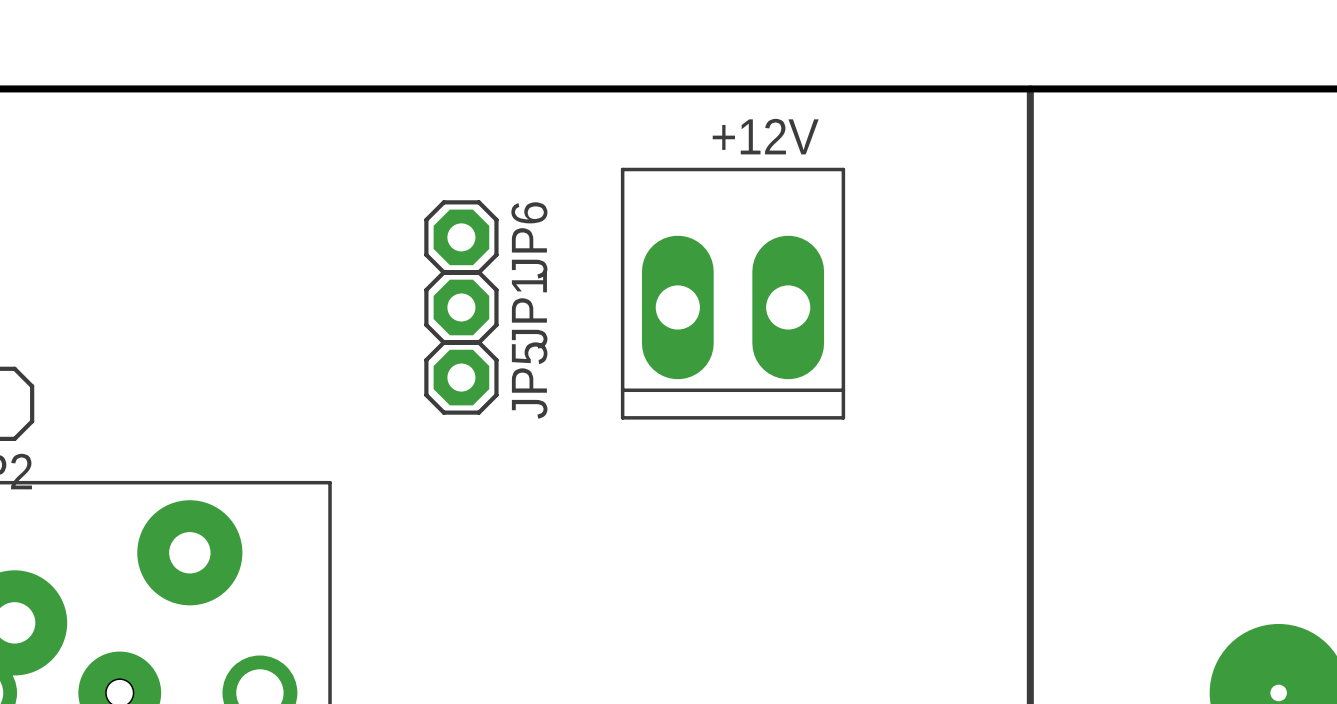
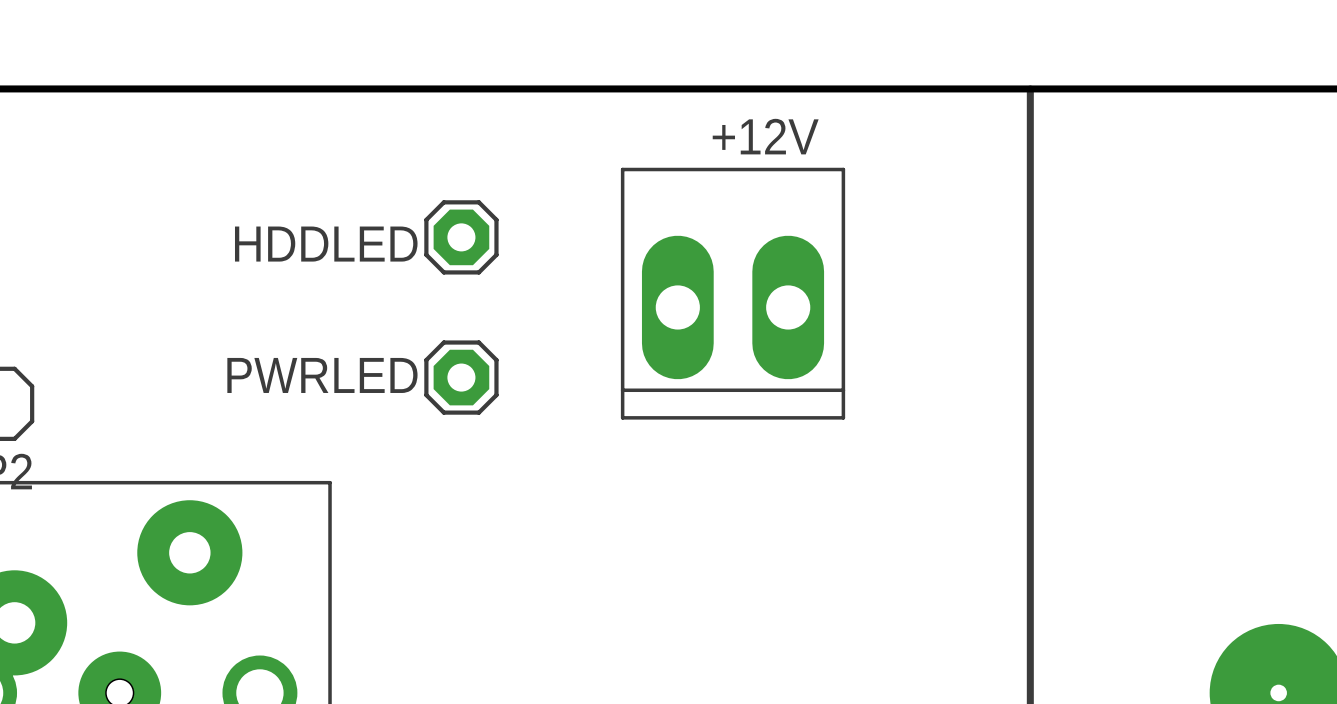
JP6 name: JP6 (529, 240) -> HDDLED (326, 244)
JP1: (461, 307) -> none
JP5 name: JP5 (529, 380) -> PWRLED (322, 375)

